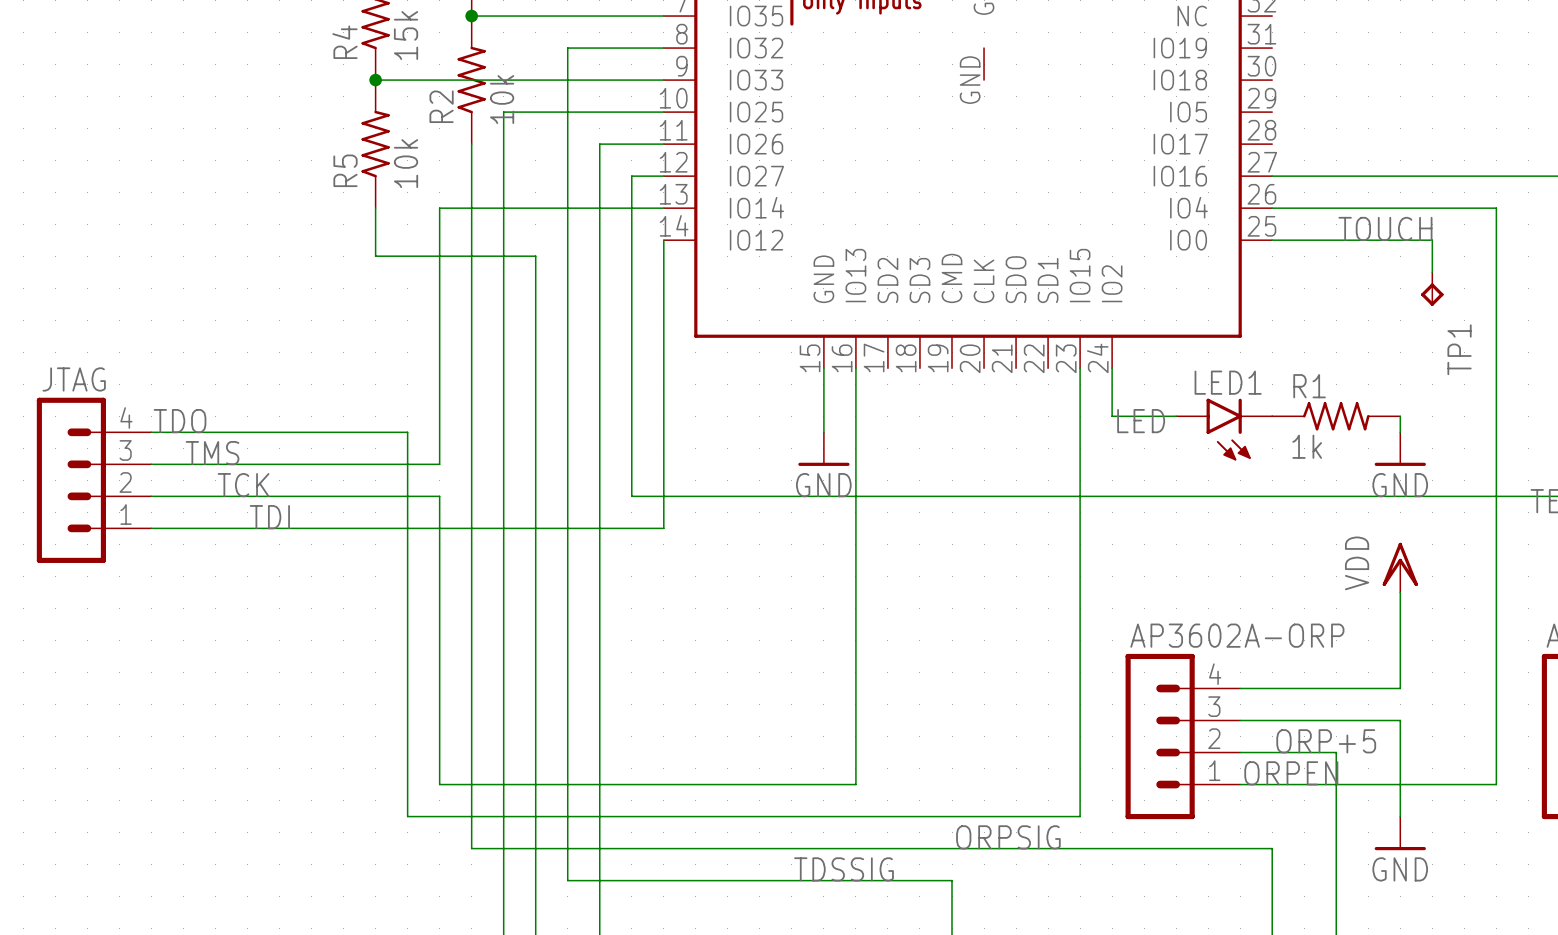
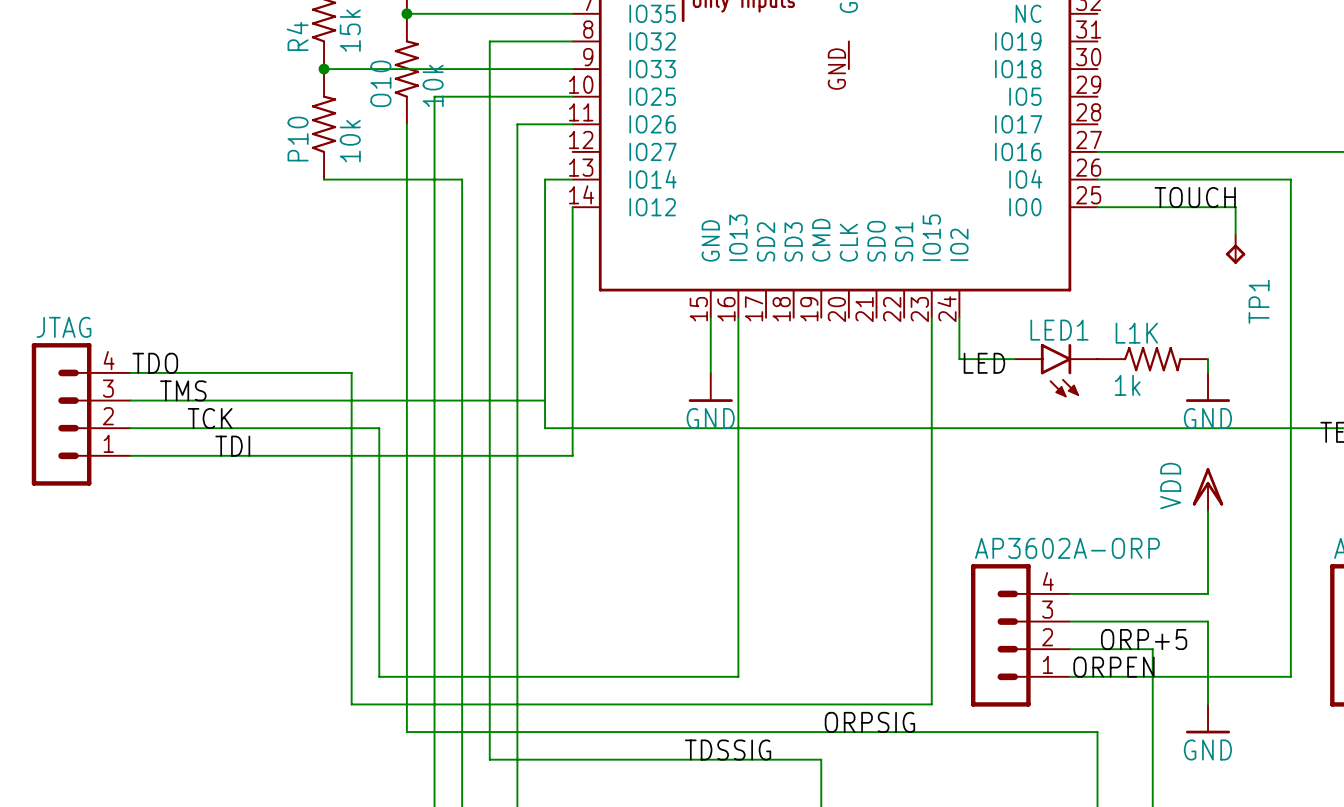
R2 name: R2 (441, 106) -> O10 (380, 83)
R5 name: R5 (345, 170) -> P10 (298, 139)
wire: (663, 176) (631, 176) (631, 208) (535, 208) -> (462, 221) (462, 179)
wire: (375, 208) (375, 256) (535, 256) -> (324, 179) (379, 179)
wire: (439, 208) (439, 464) -> (545, 400) (379, 400)
R1 name: R1 (1309, 386) -> L1K (1136, 333)

